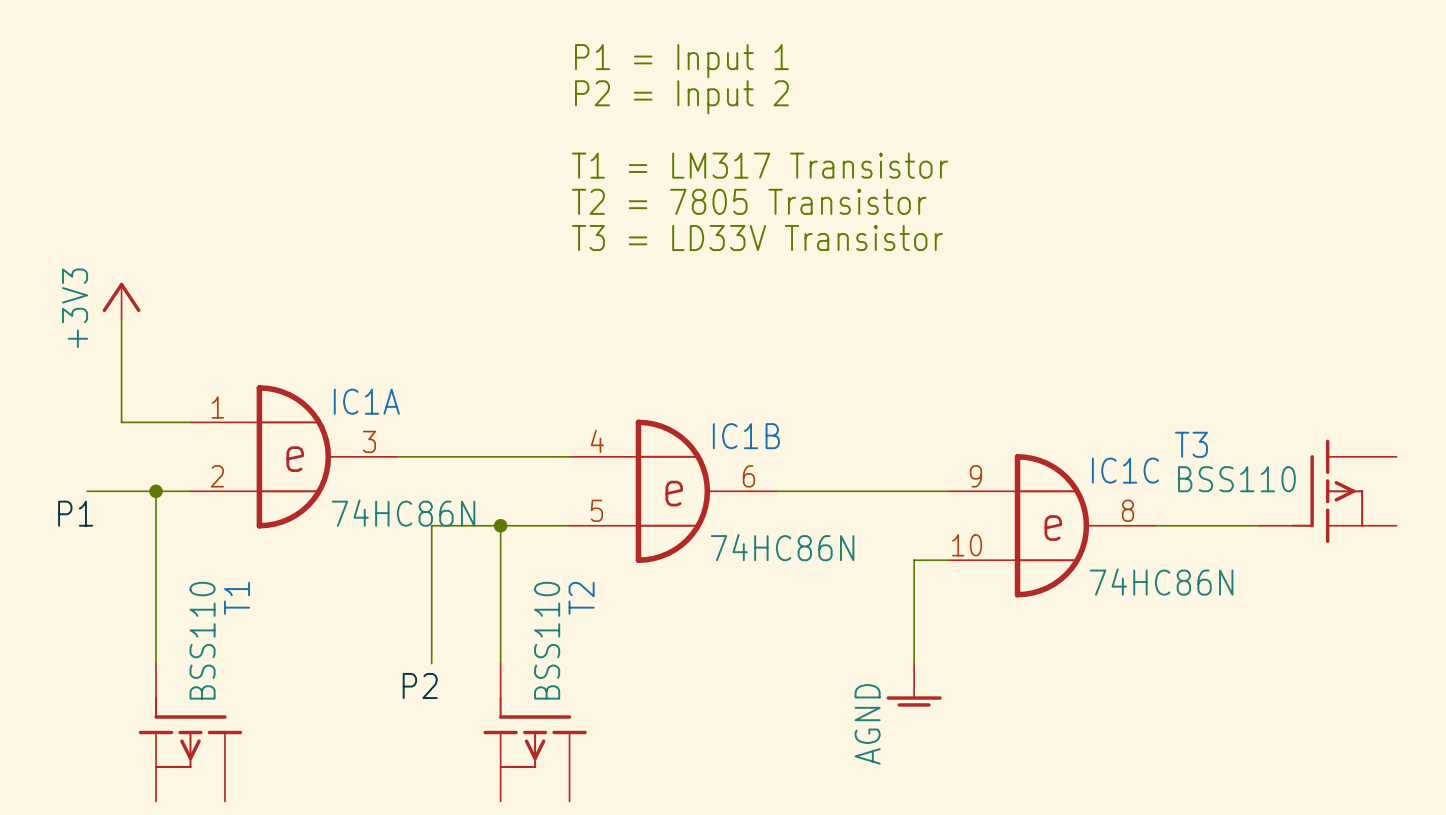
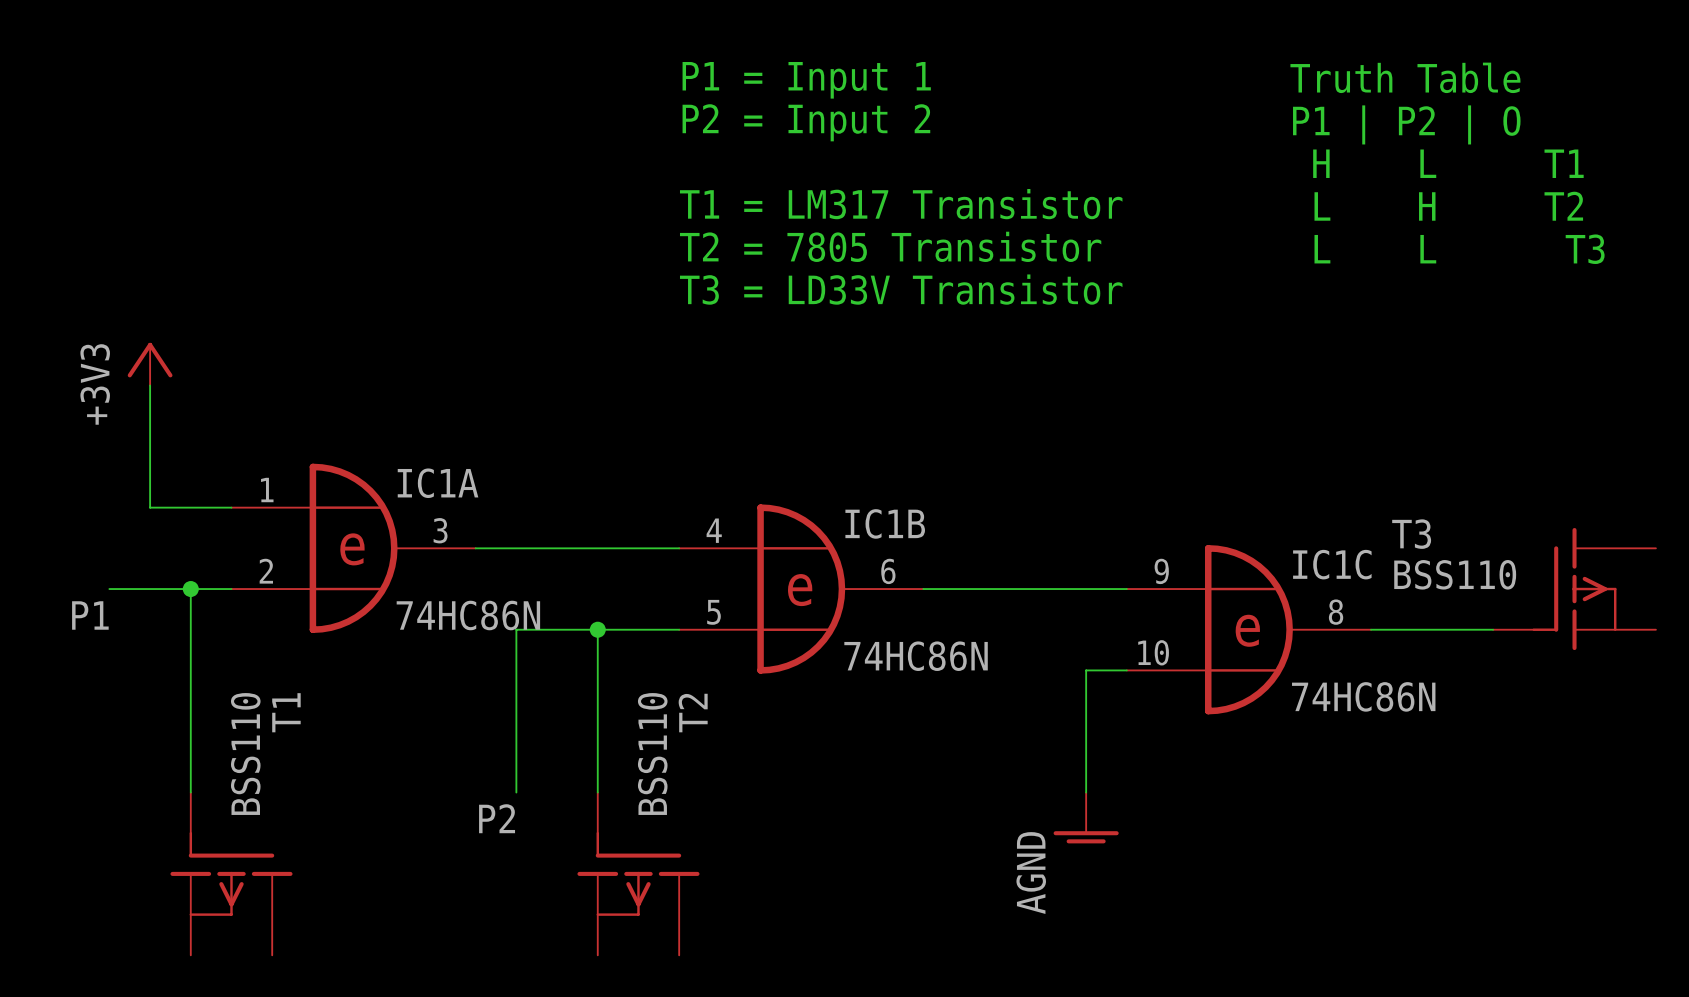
text: none -> Truth Table (1405, 77)
text: none -> P1 | P2 | O (1406, 124)
text: none -> H L T1 (1448, 163)
text: none -> L H T2 (1448, 206)
text: none -> L L T3 (1459, 249)

